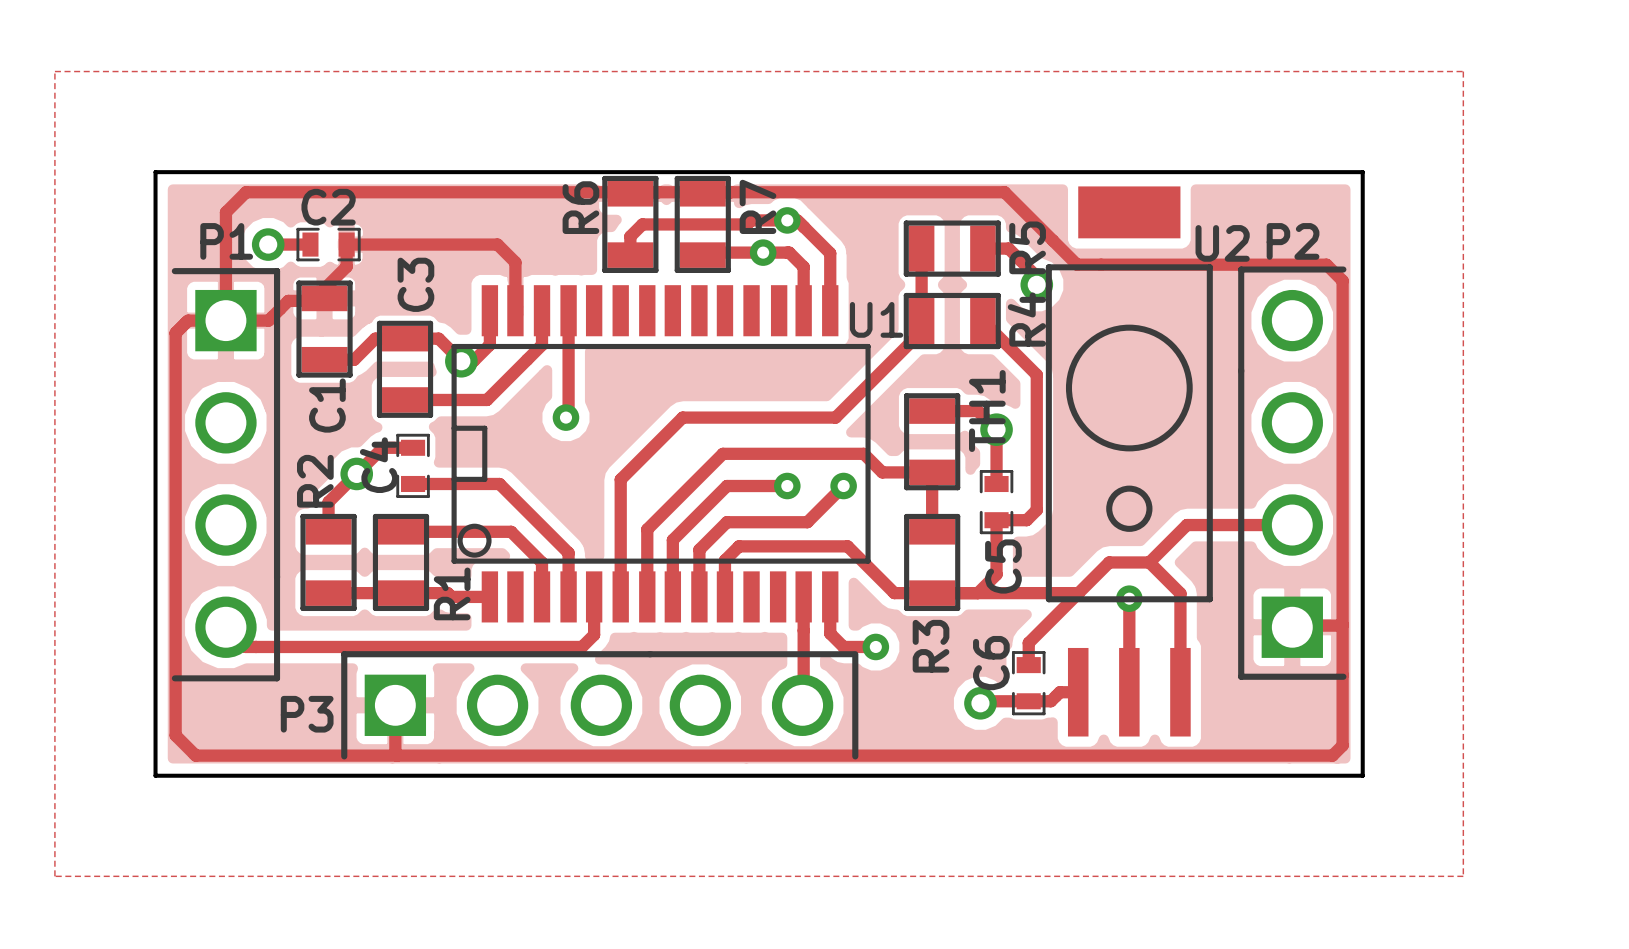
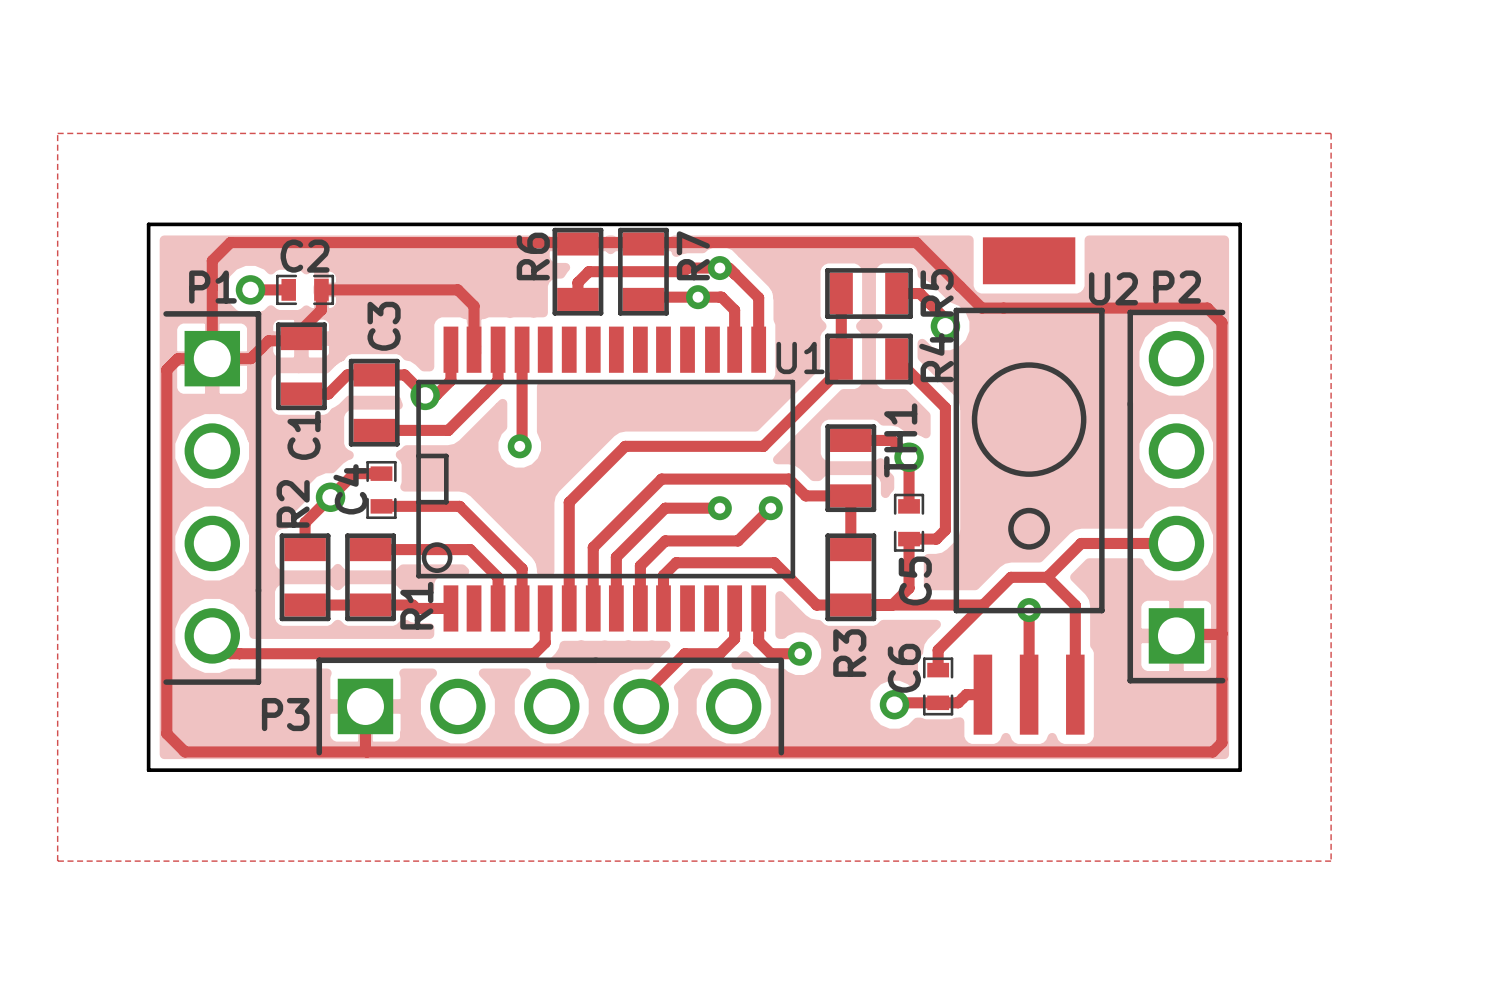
track: (803, 630) (802, 705) -> (734, 638) (719, 653) (684, 653) (641, 697)

